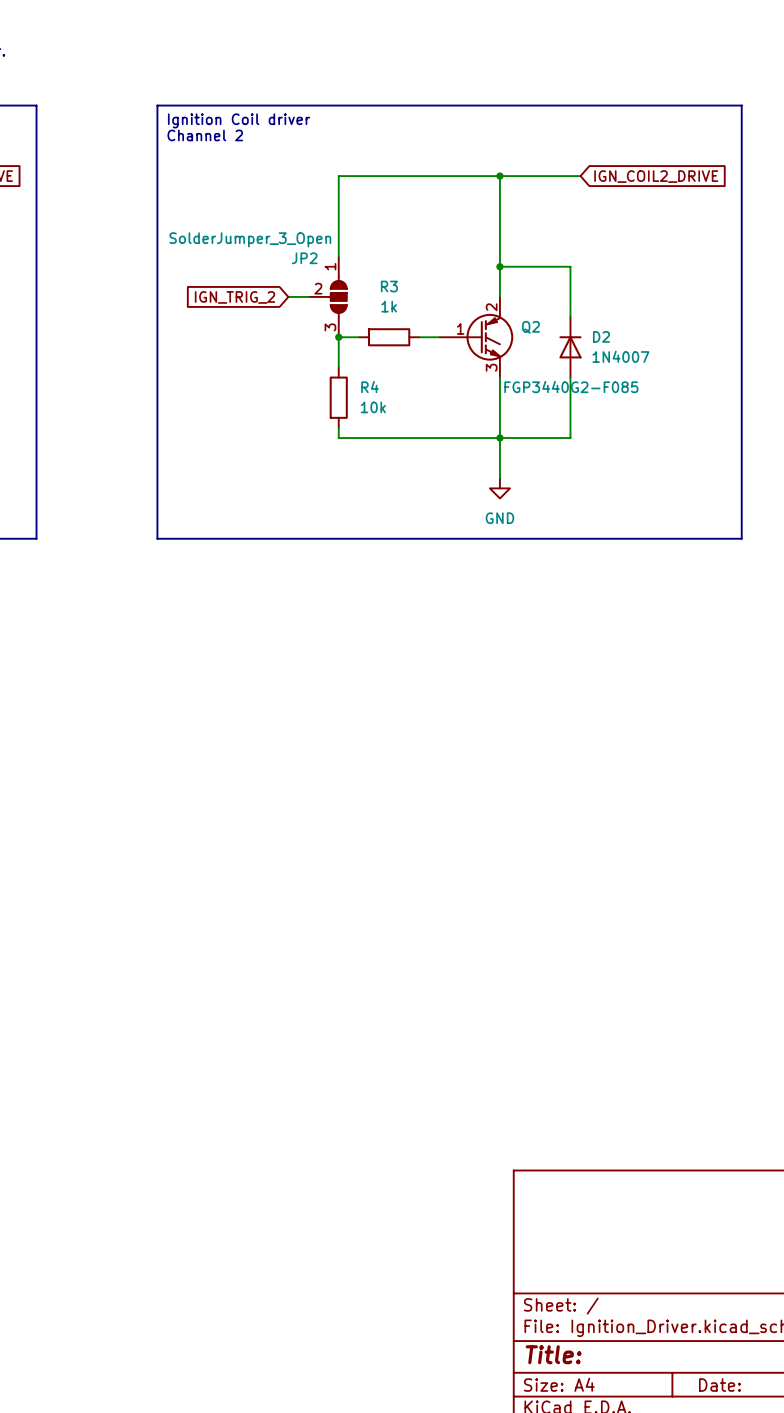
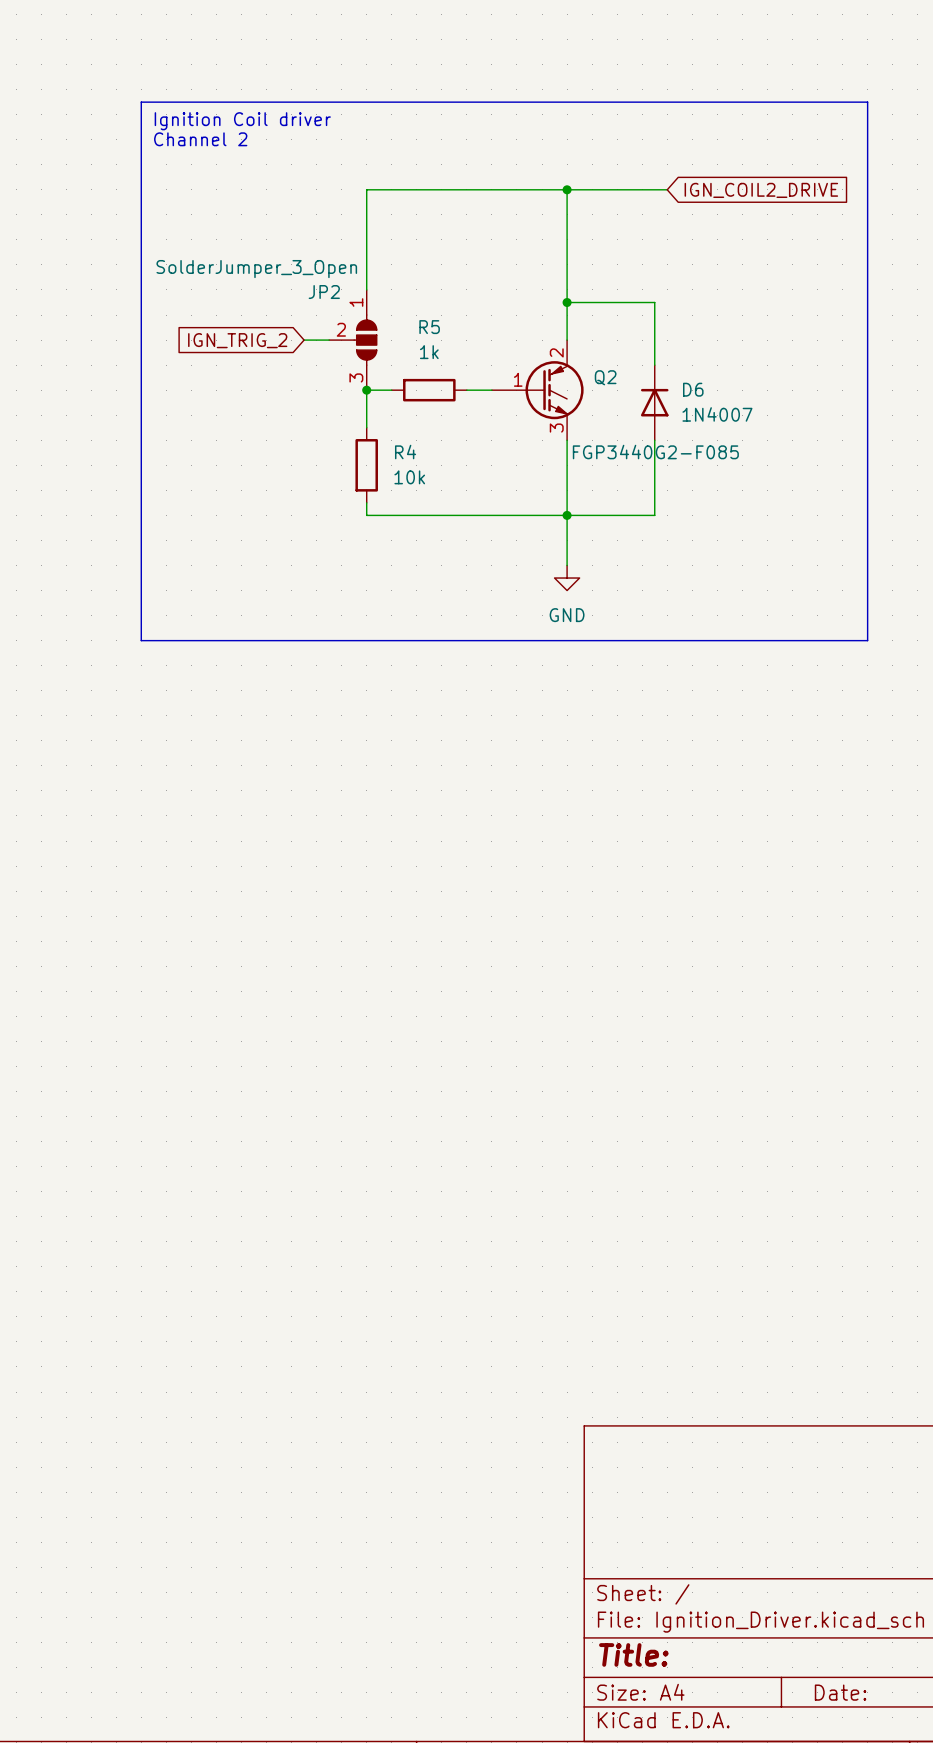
R3 name: R3 (389, 286) -> R5 (429, 327)
D2 name: D2 (601, 336) -> D6 (693, 389)

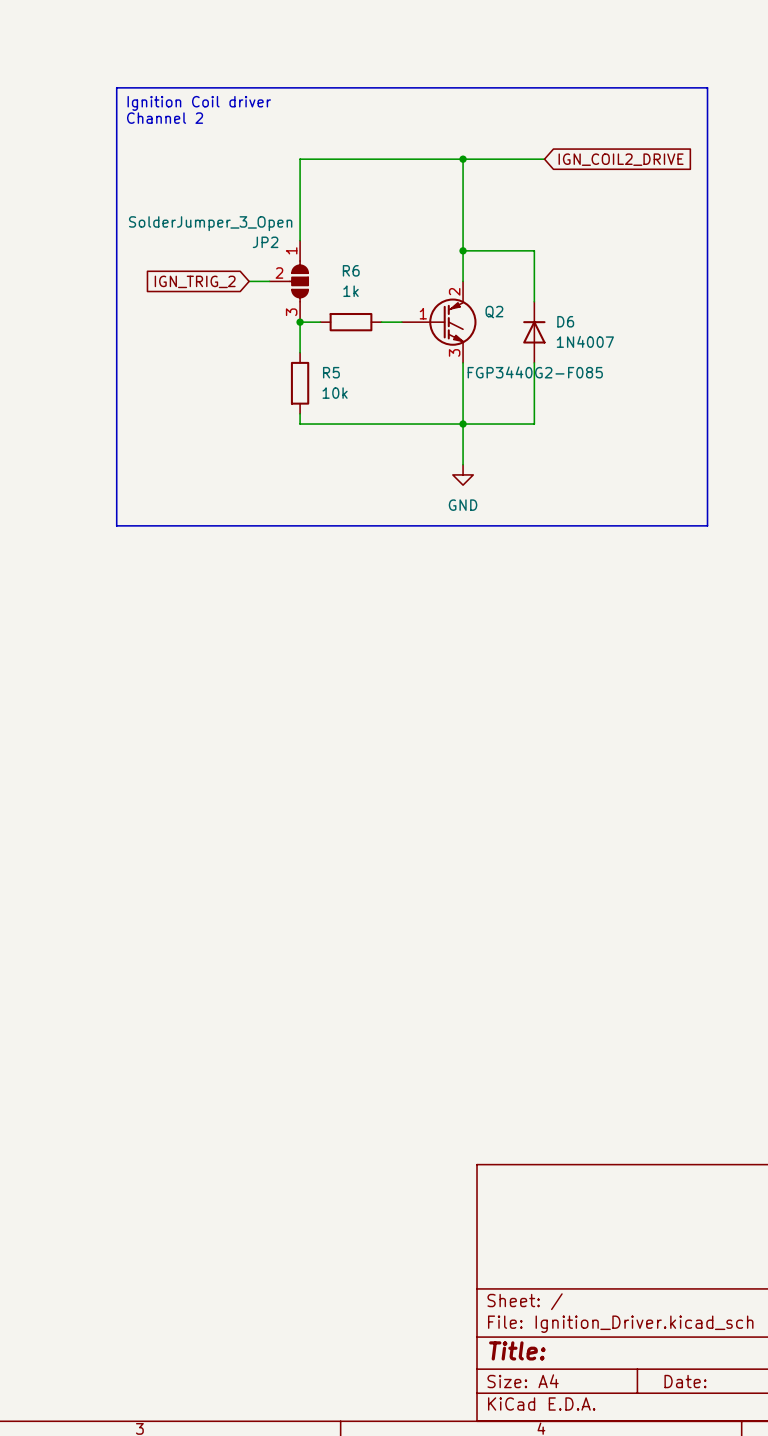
R5 name: R5 (429, 327) -> R6 (351, 270)
R4 name: R4 (405, 452) -> R5 (331, 372)

